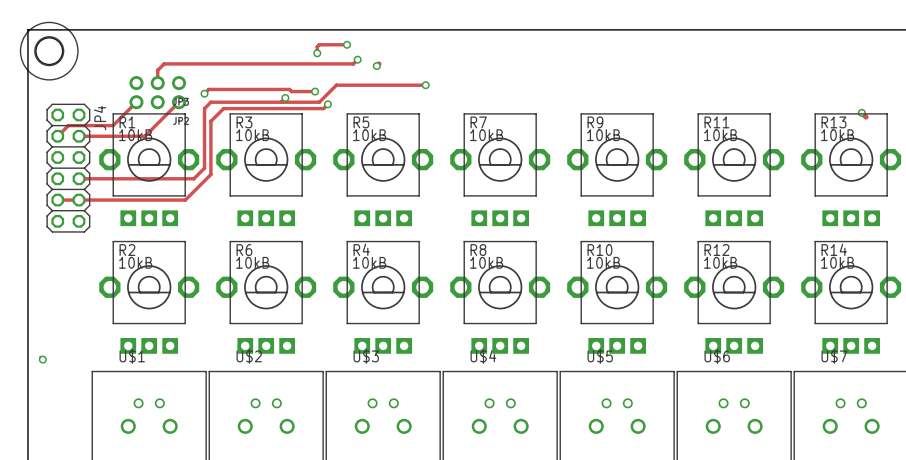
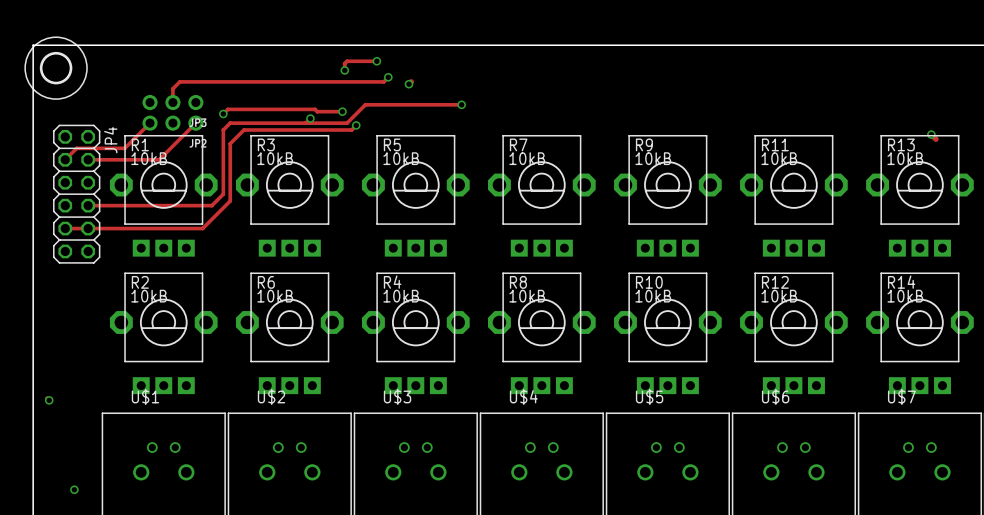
via: none -> (74, 489)

